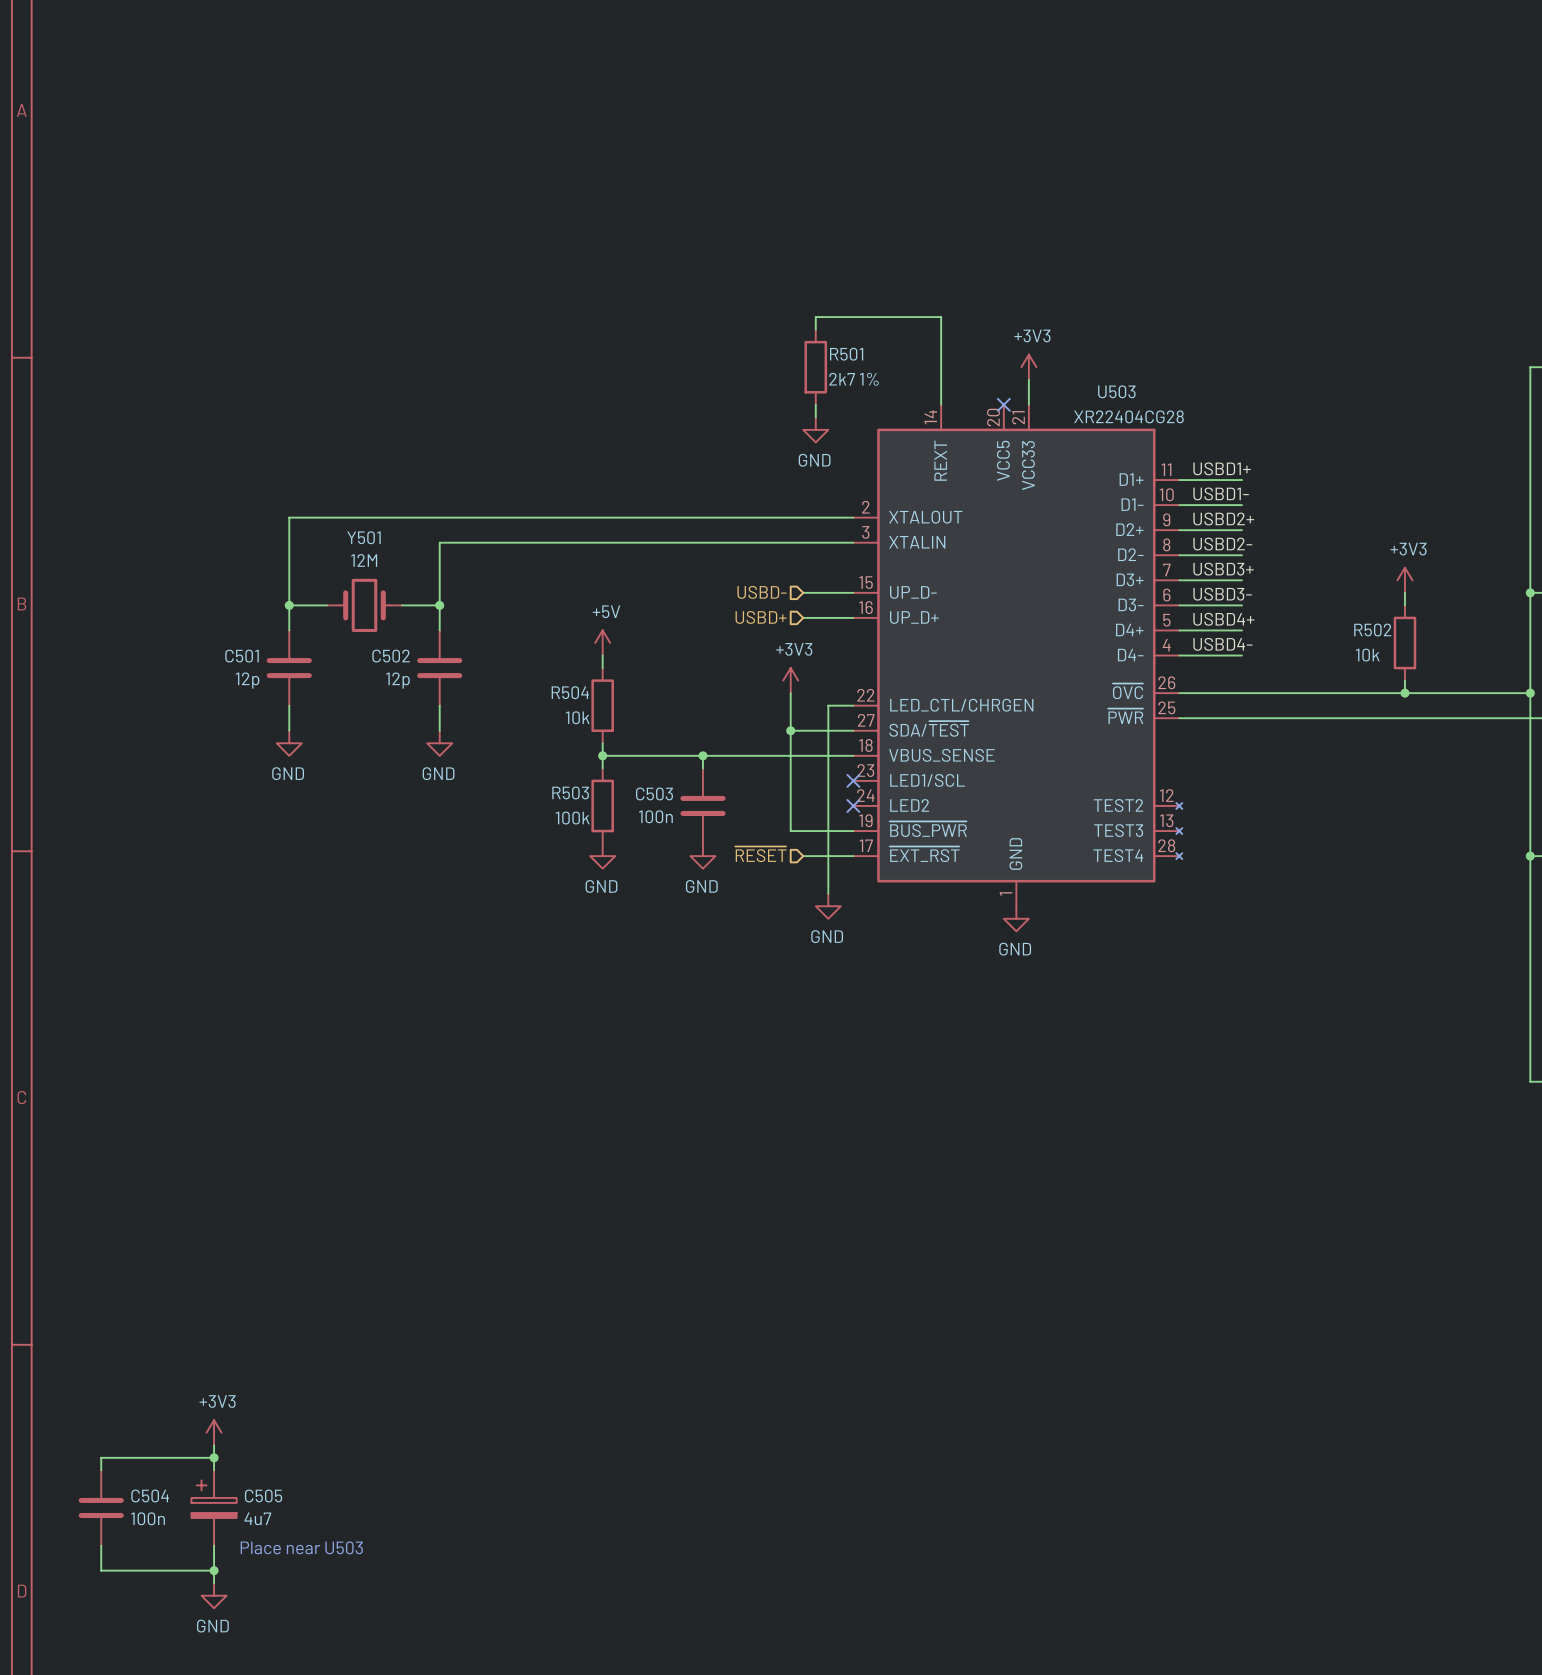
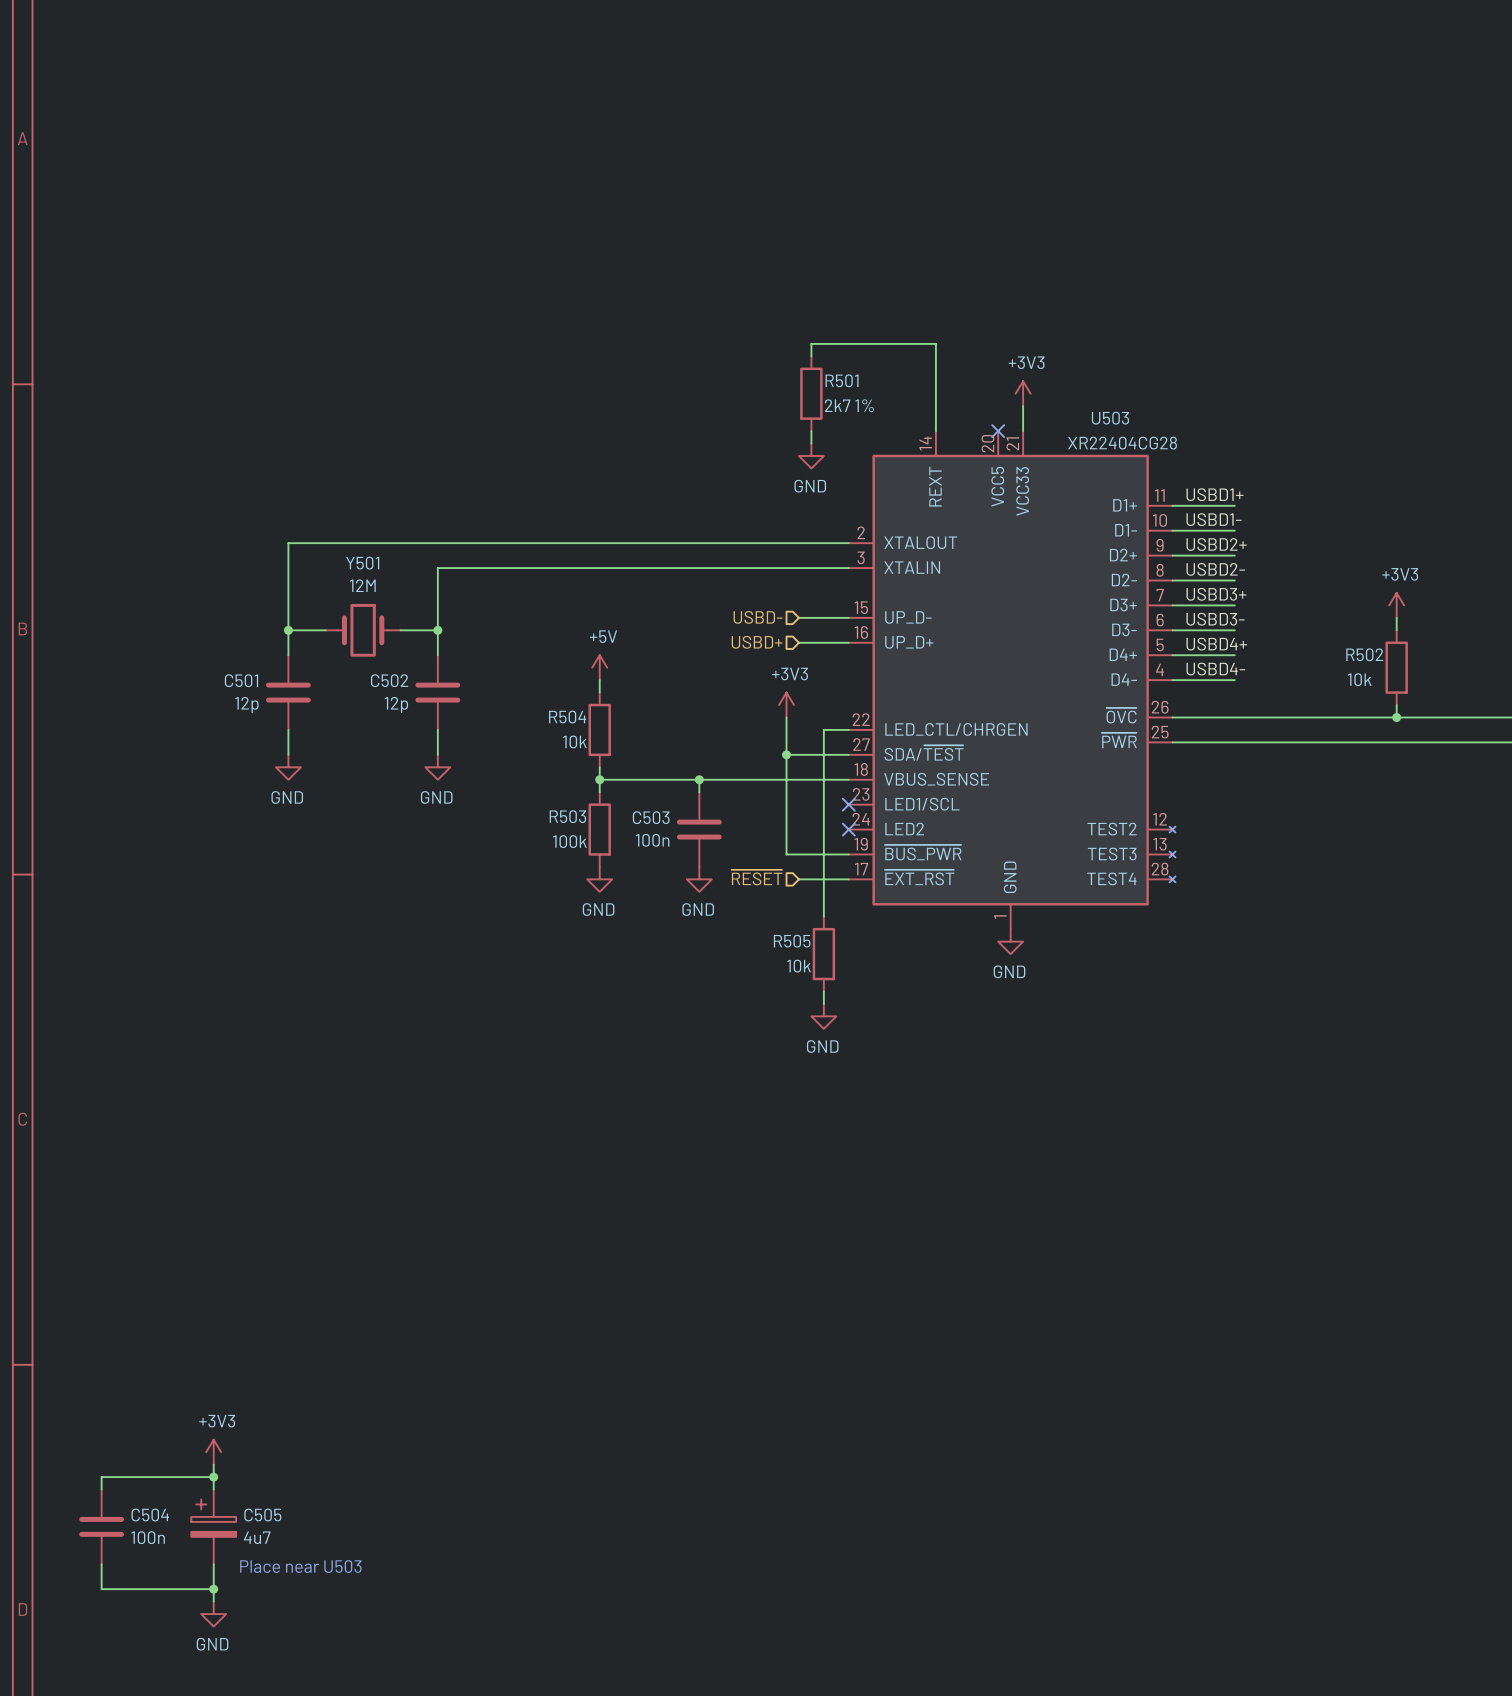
power symbol position: GND (828, 906) -> GND (823, 1016)
R505: none -> 10k (823, 954)
wire: none -> (823, 991) (823, 1003)

